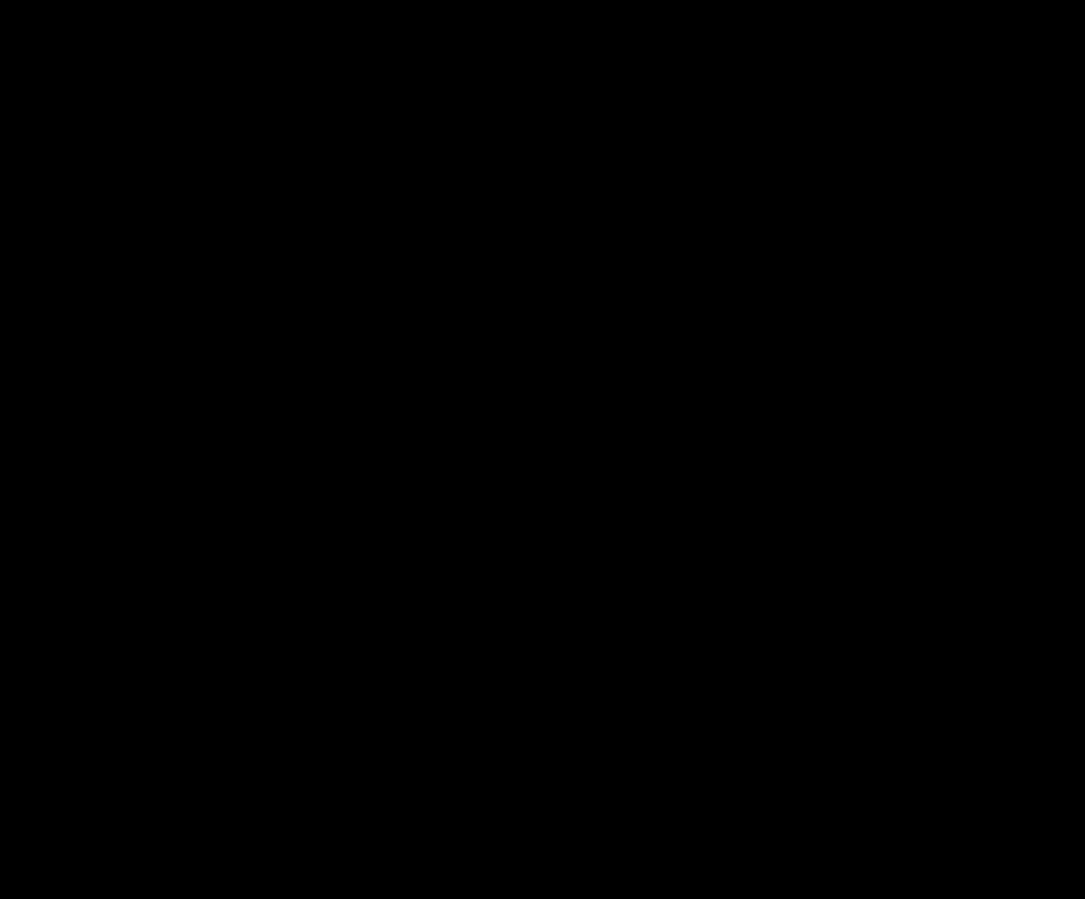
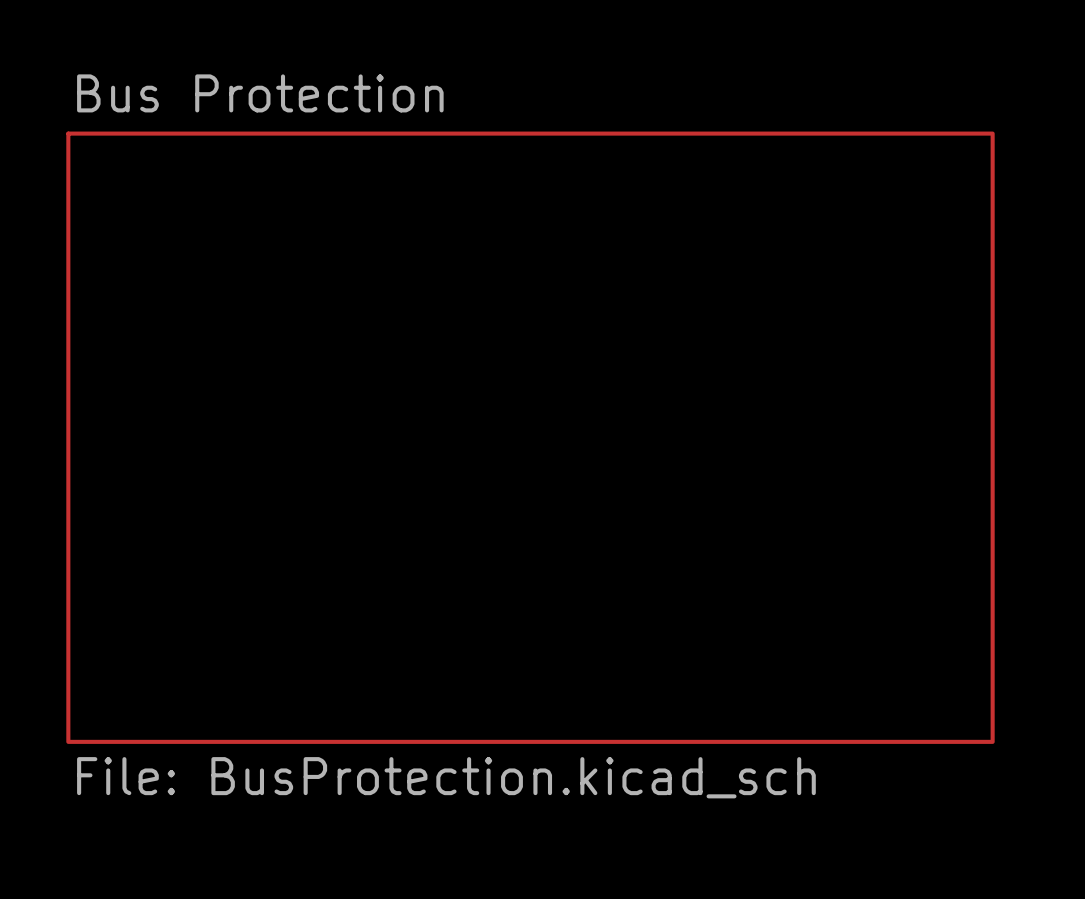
sheet Bus Protection: none -> File: BusProtection.kicad_sch (530, 437)

